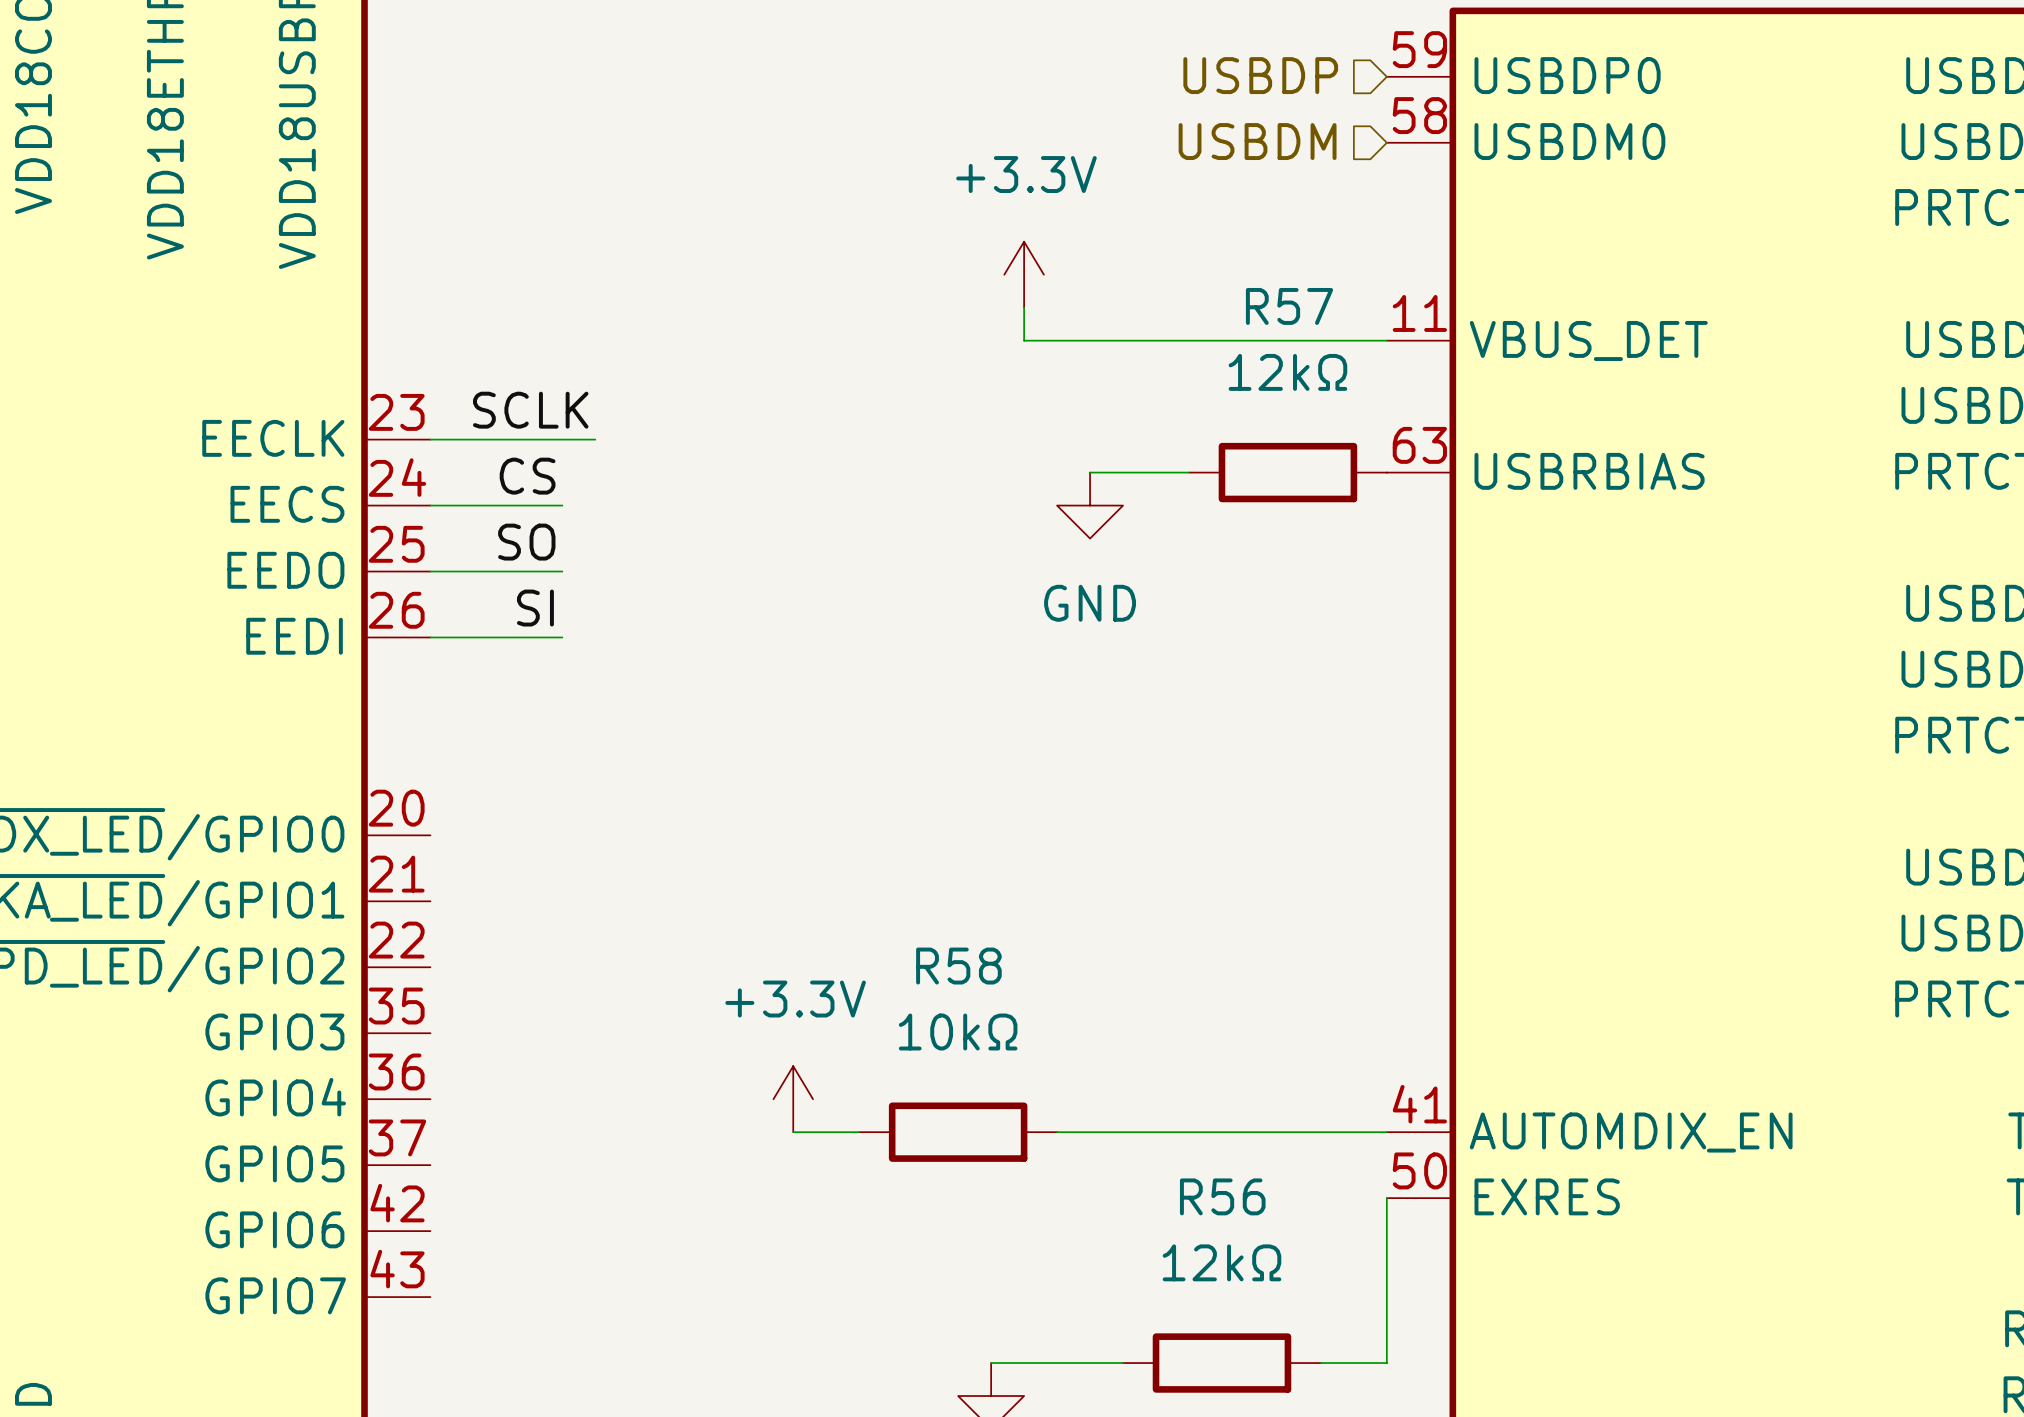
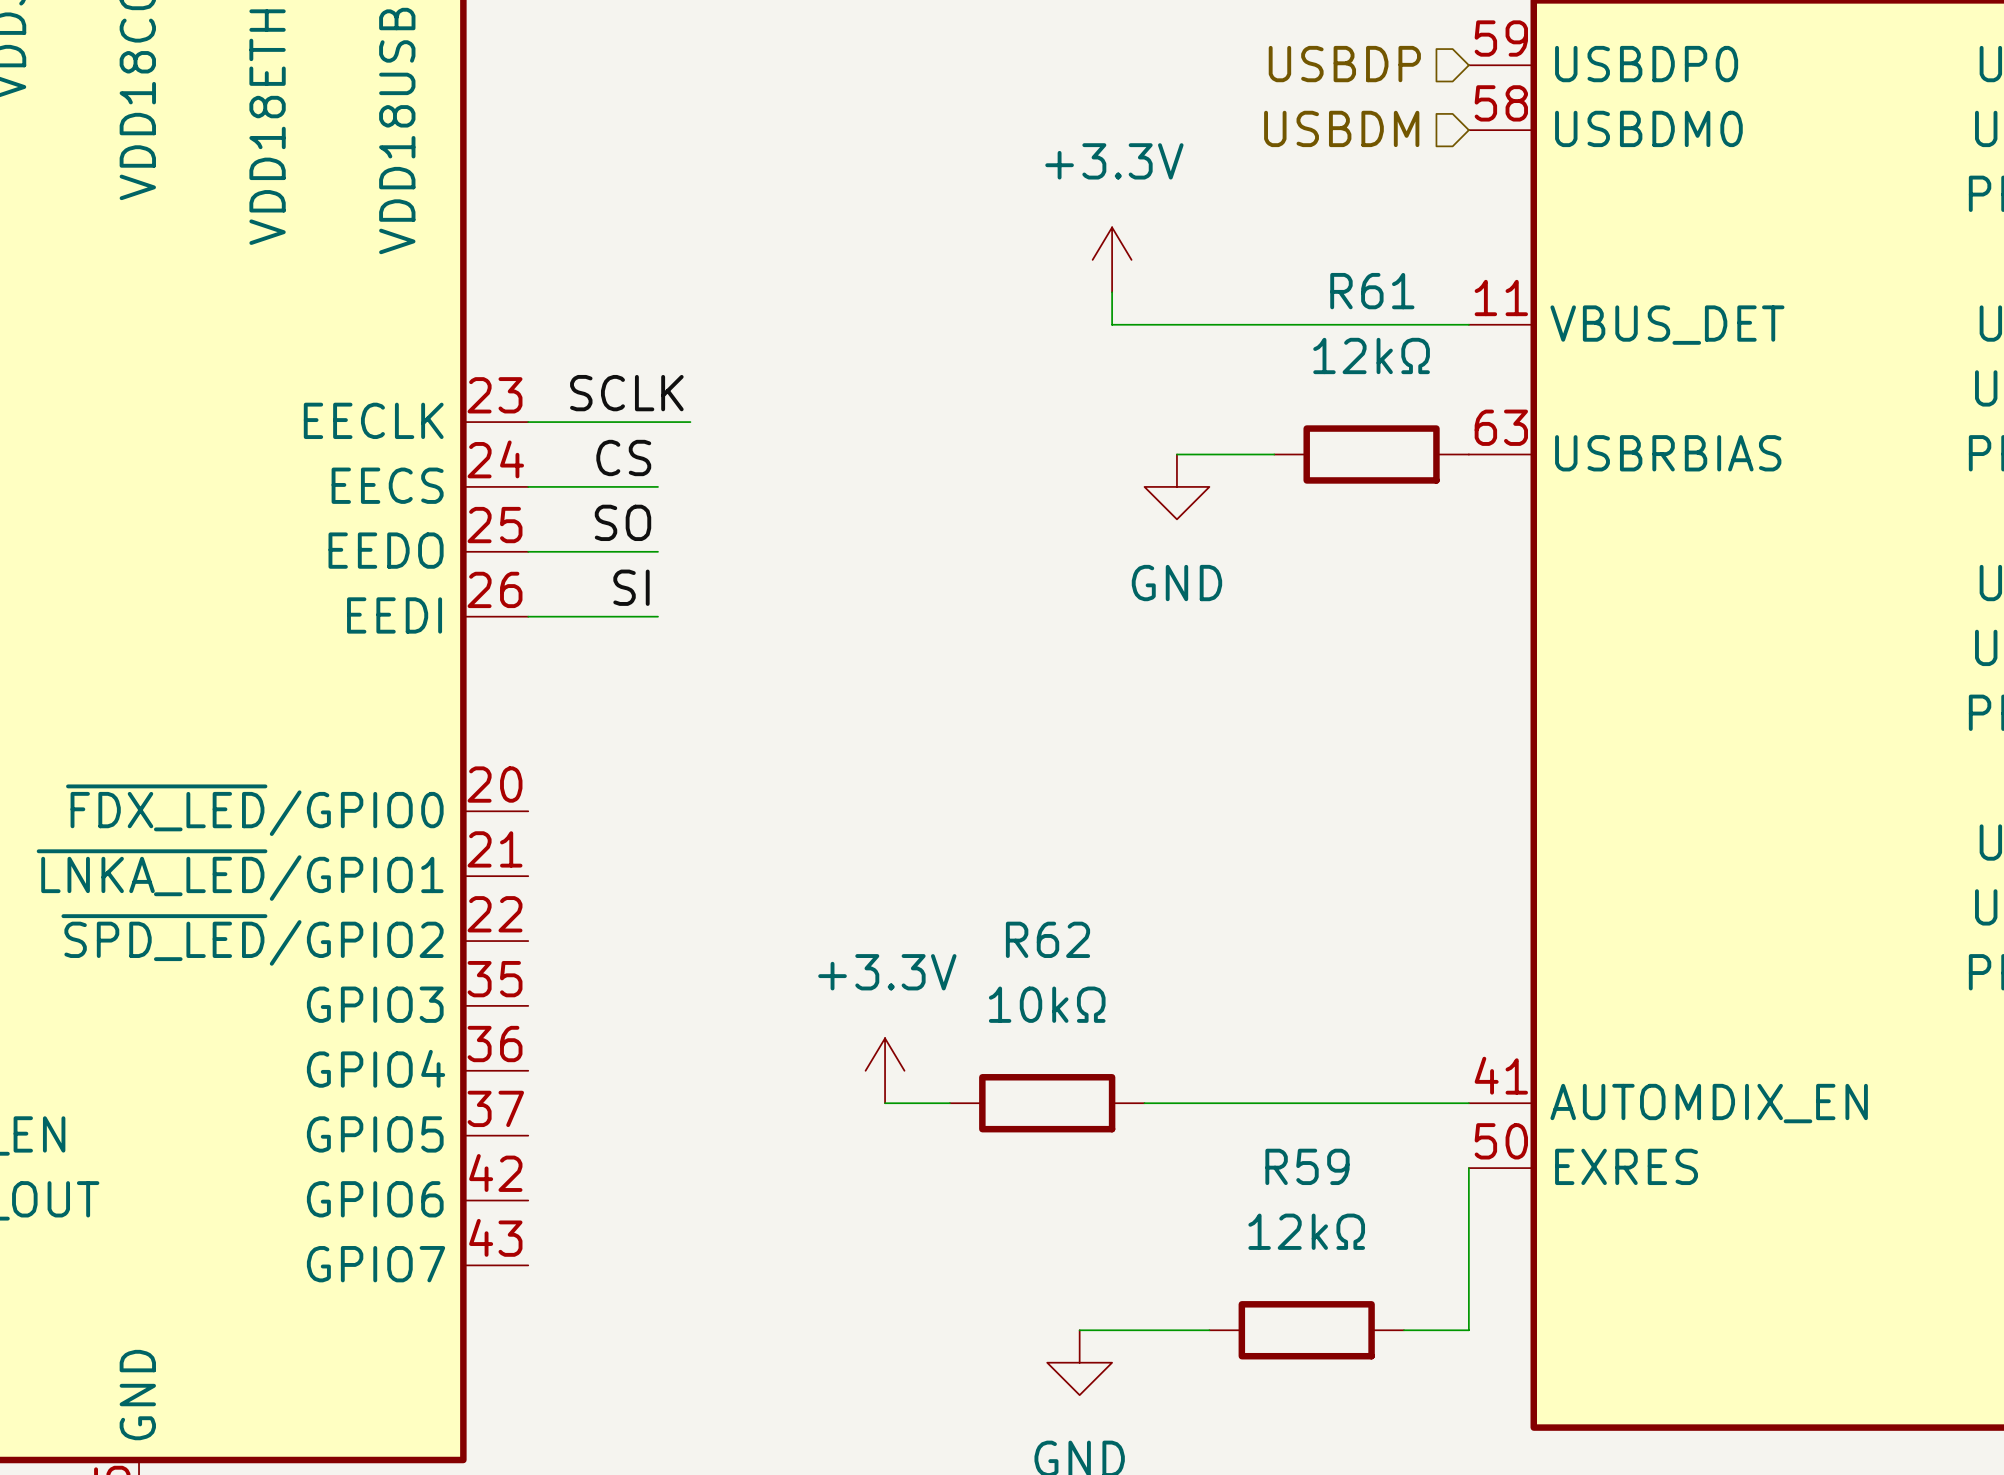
R57 name: R57 (1289, 306) -> R61 (1372, 291)
R58 name: R58 (958, 966) -> R62 (1047, 939)
R56 name: R56 (1222, 1196) -> R59 (1307, 1166)

